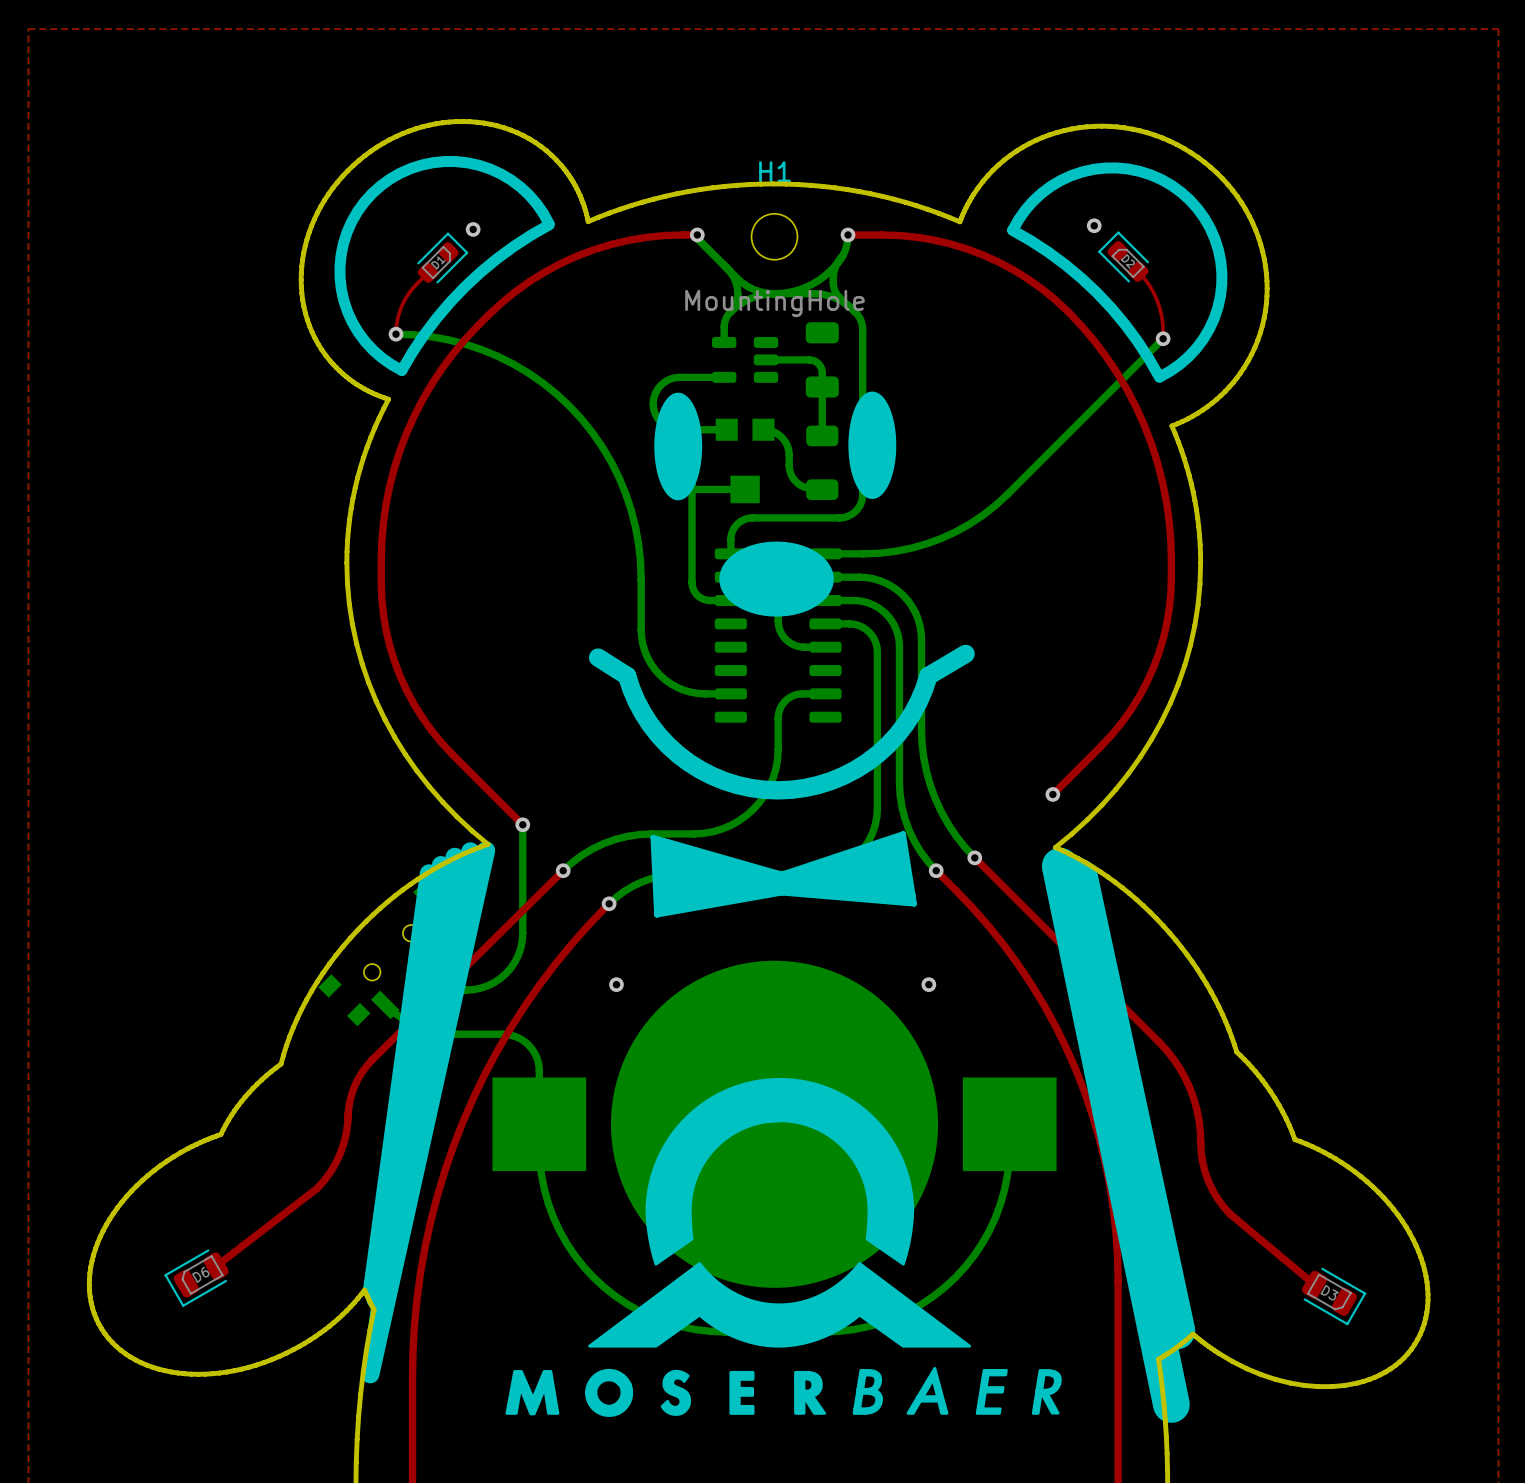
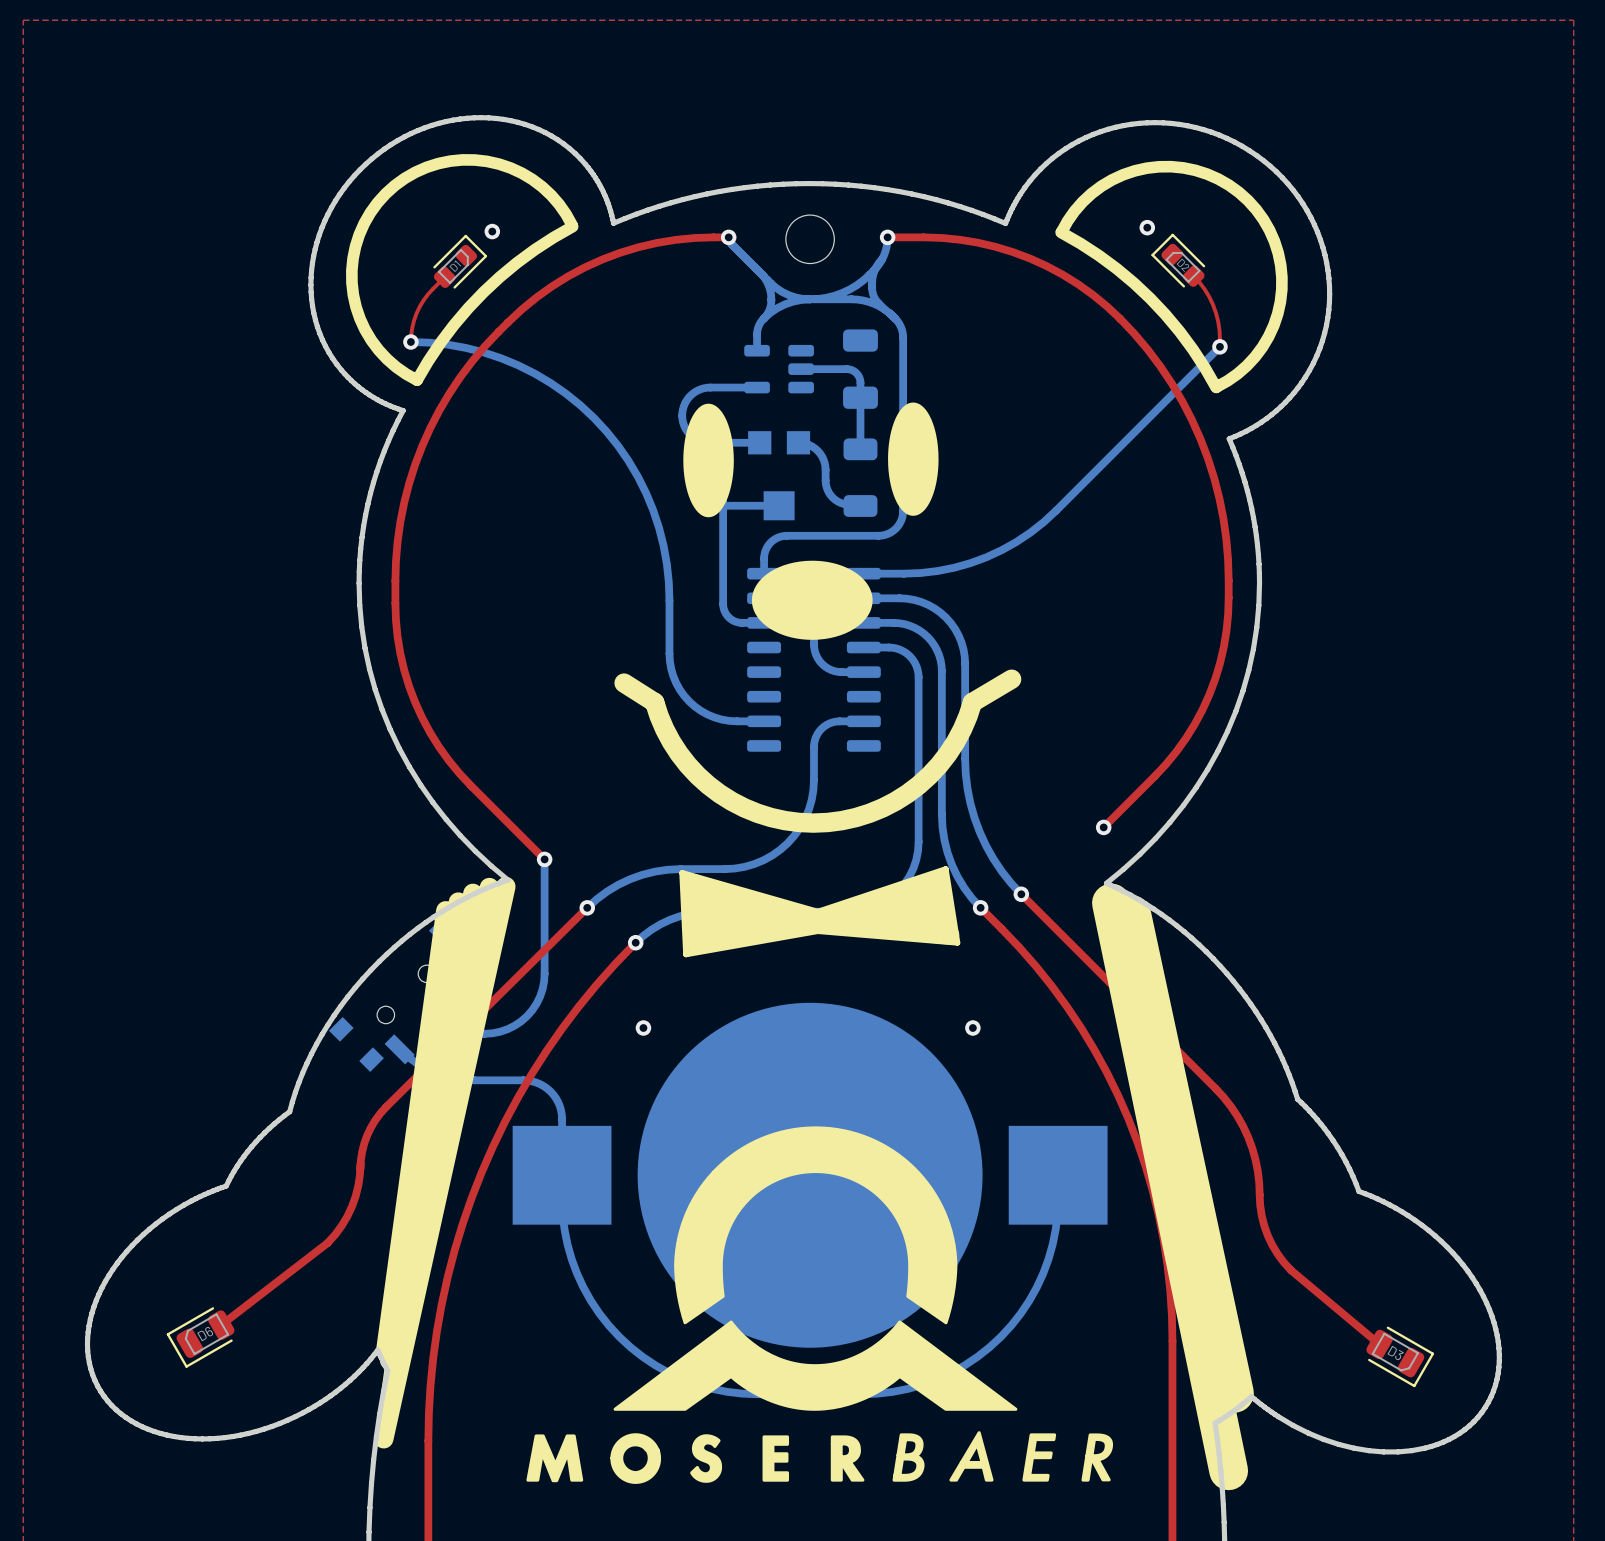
H1 name: H1 (774, 171) -> none
H1 value: MountingHole (774, 303) -> none

